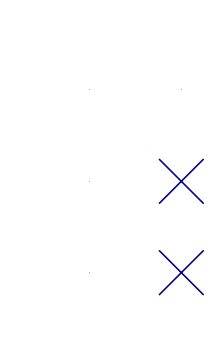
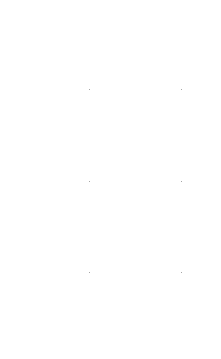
no-connect mark: (181, 181) -> none
no-connect mark: (181, 272) -> none

